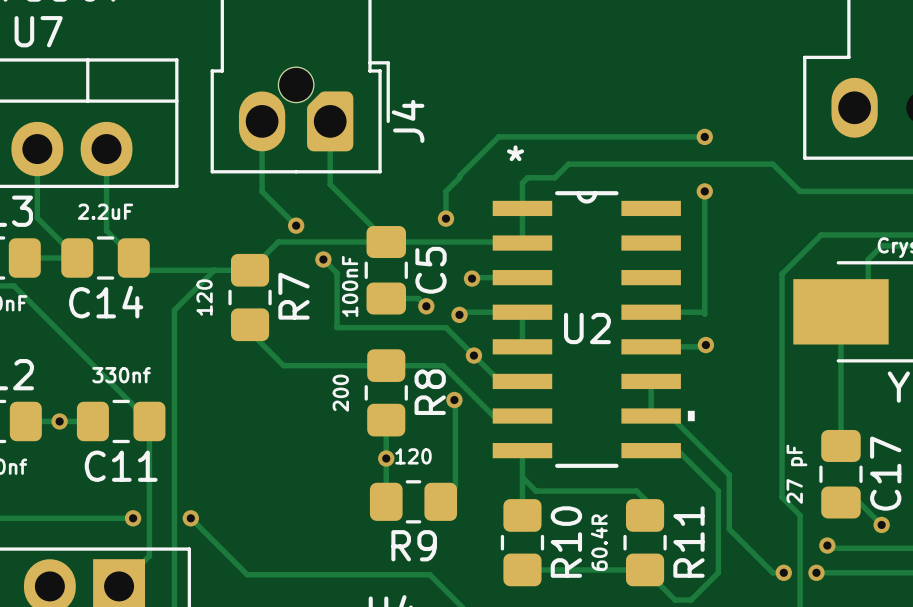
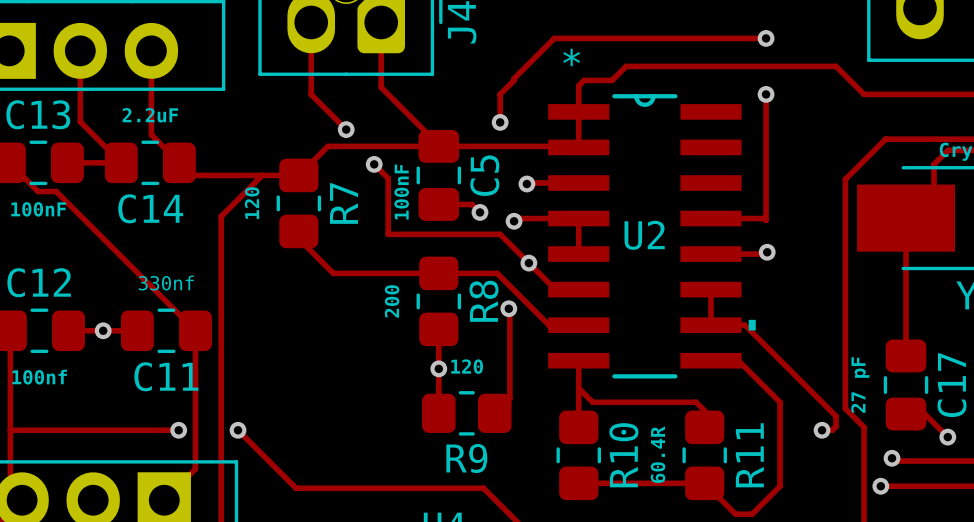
track: (670, 416) (729, 475) (729, 529) (772, 572) (783, 572) -> (730, 325) (744, 325) (836, 416) (836, 426) (832, 430) (822, 430)
via position: (783, 572) -> (822, 430)

